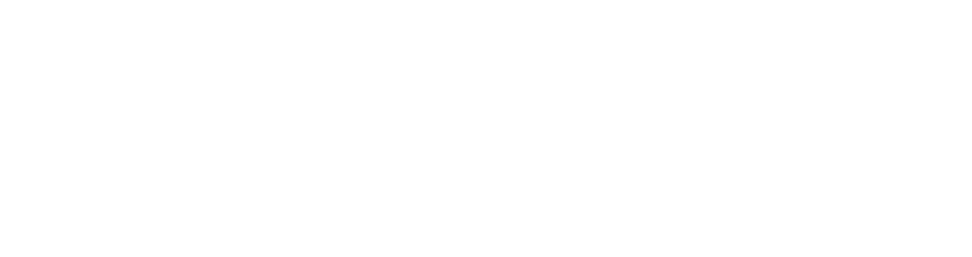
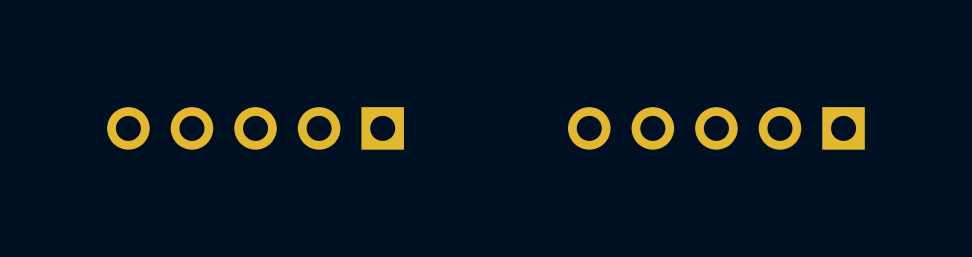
part: none -> (255, 128)
part: none -> (716, 128)

